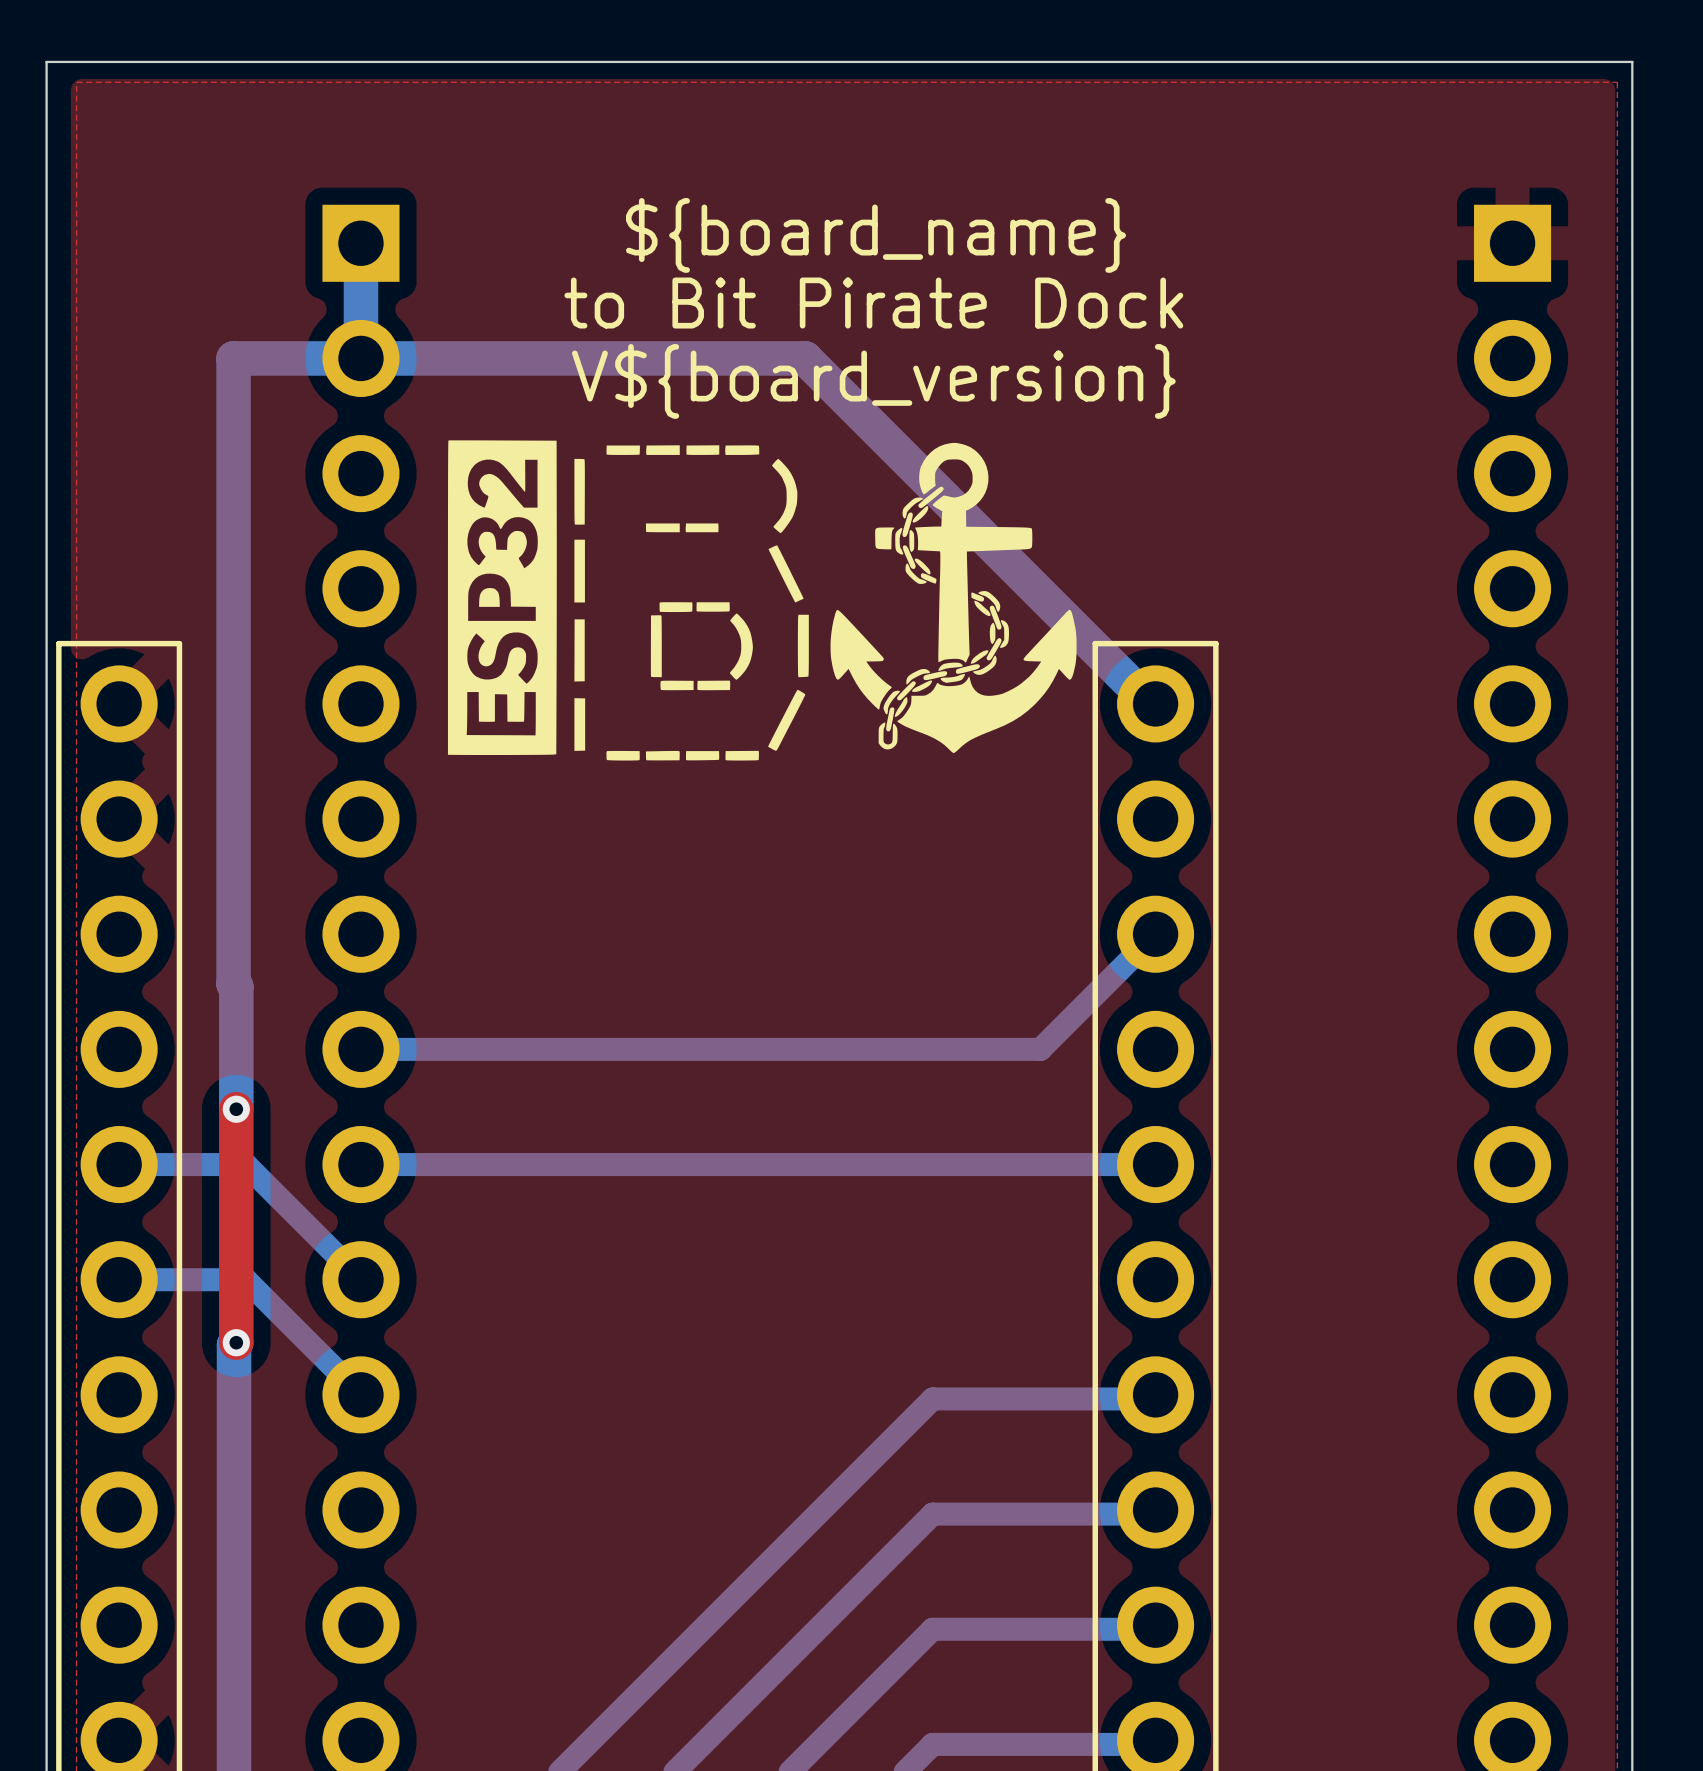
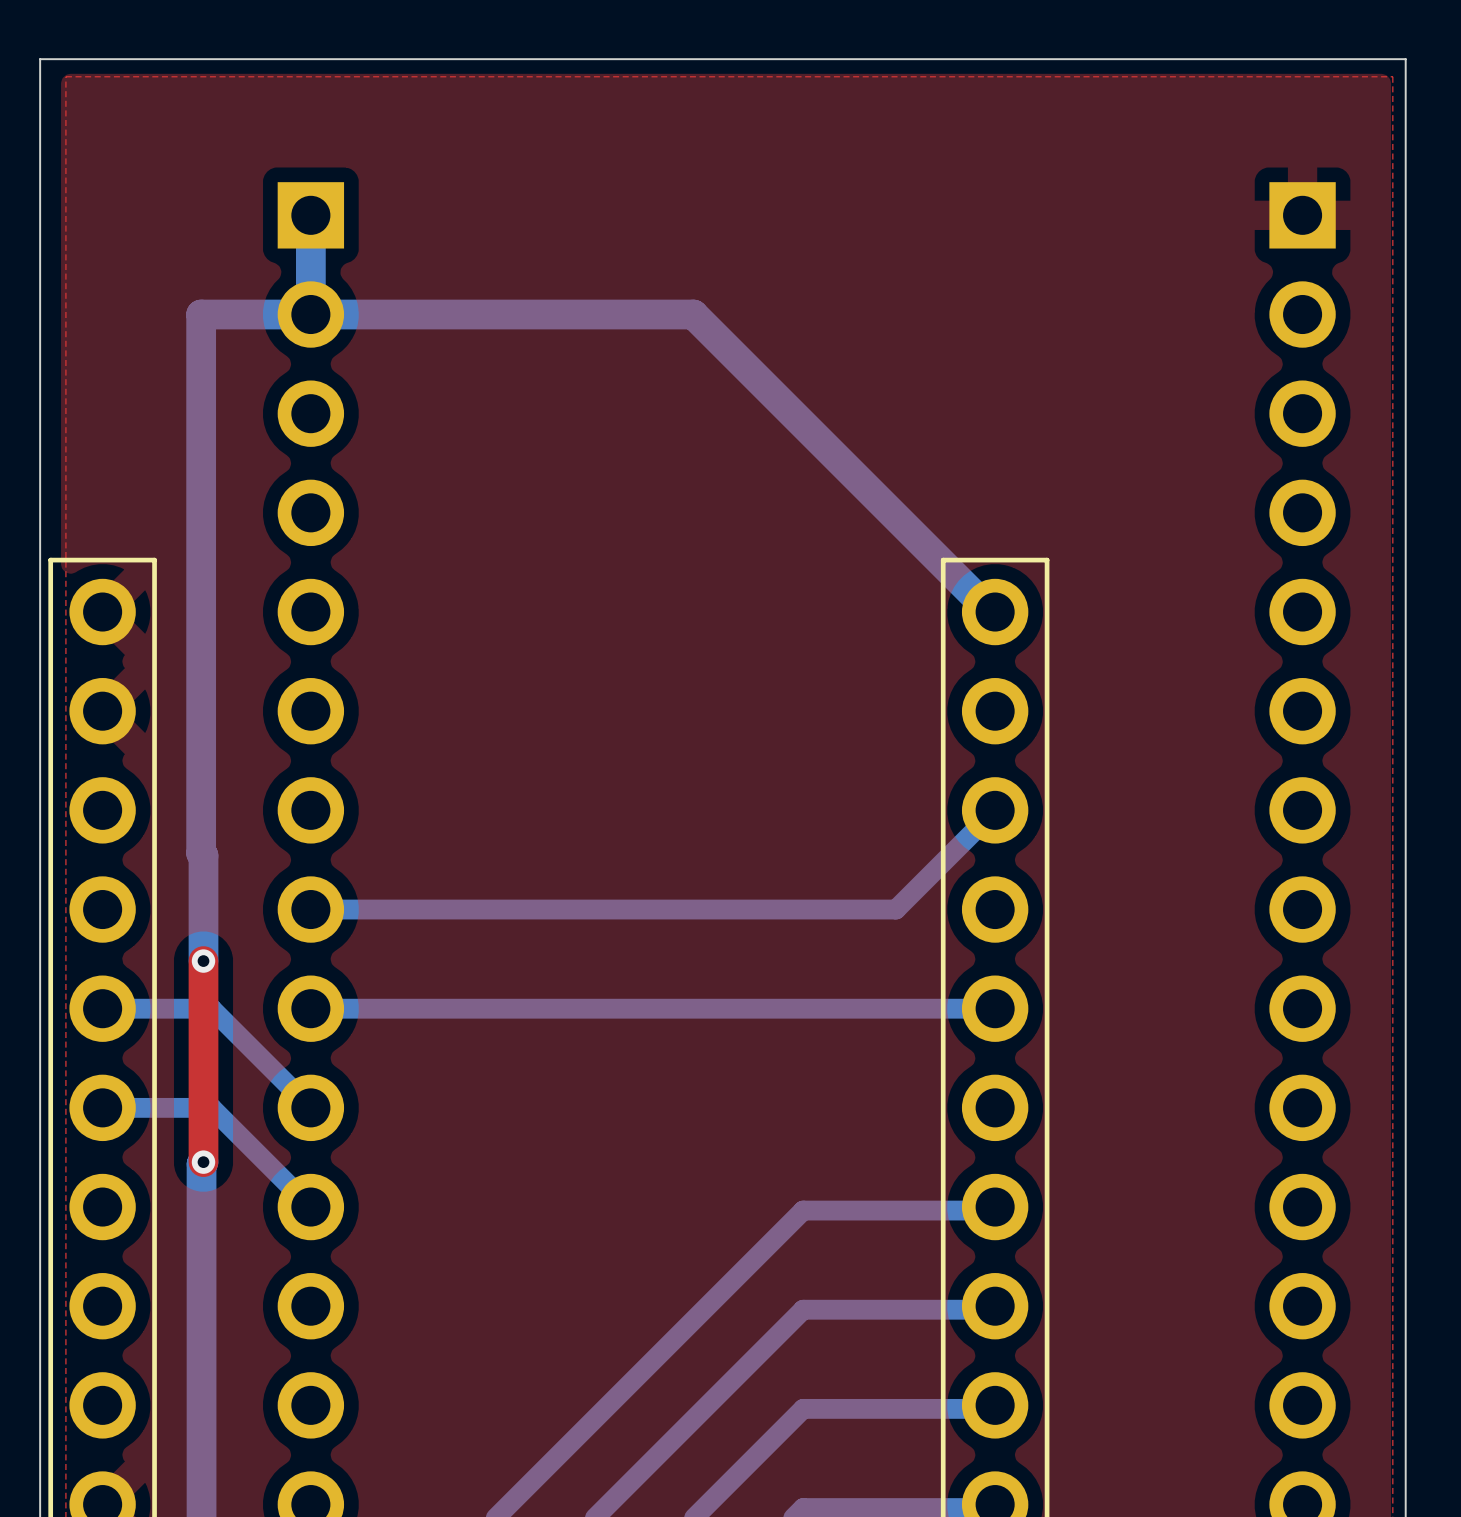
text: ${board_name} (876, 235) -> none
text: to Bit Pirate Dock (873, 303) -> none
text: V${board_version} (873, 381) -> none
drawing: [447, 440, 1077, 761] -> none

